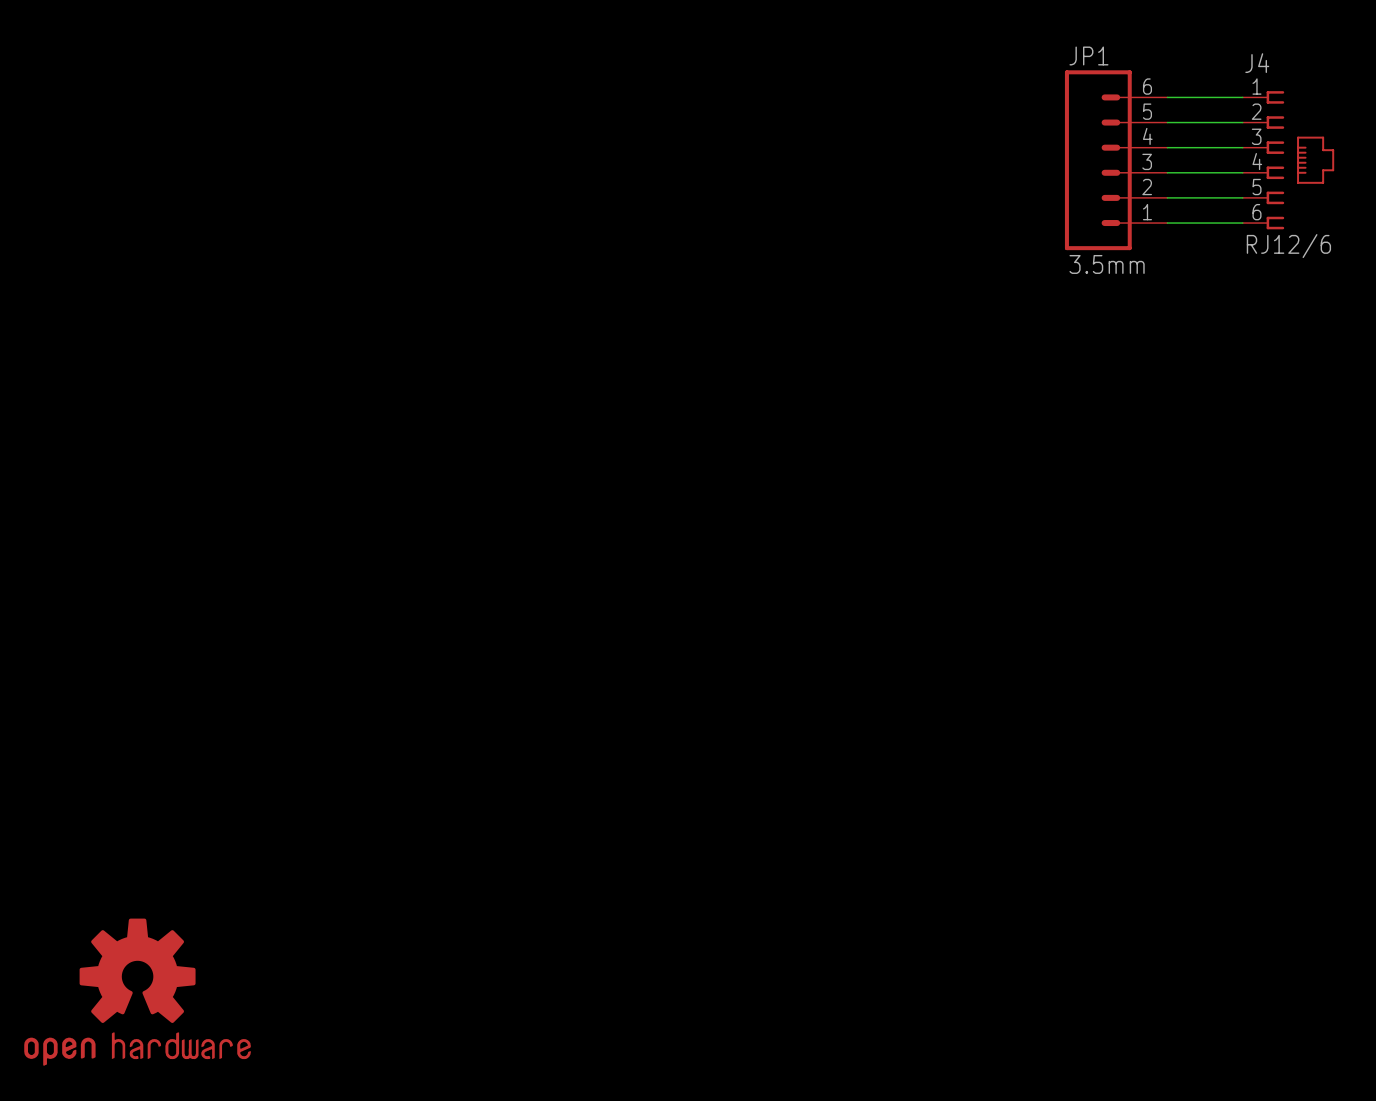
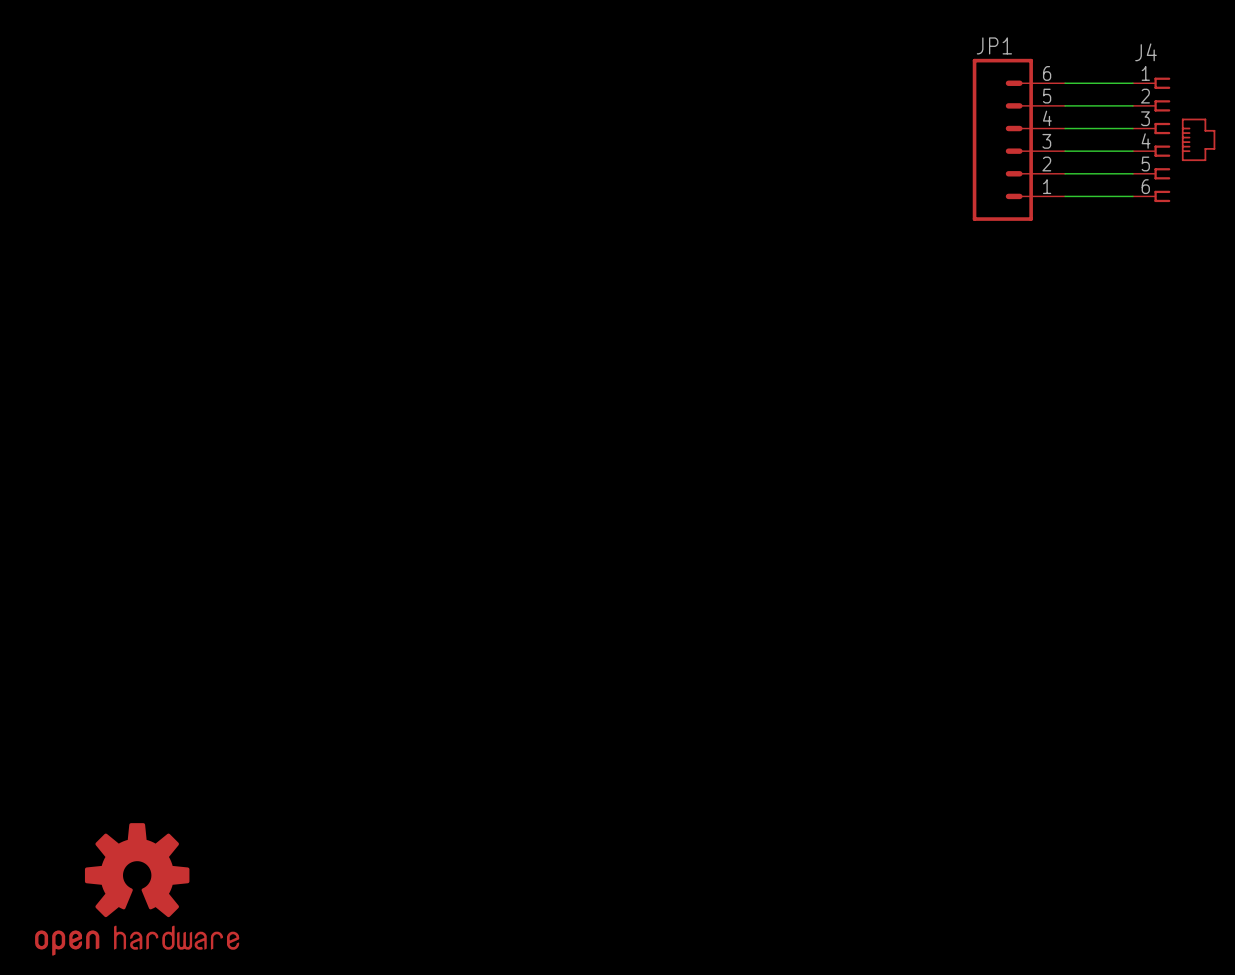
J4 value: RJ12/6 (1288, 246) -> none
JP1 value: 3.5mm (1107, 264) -> none

